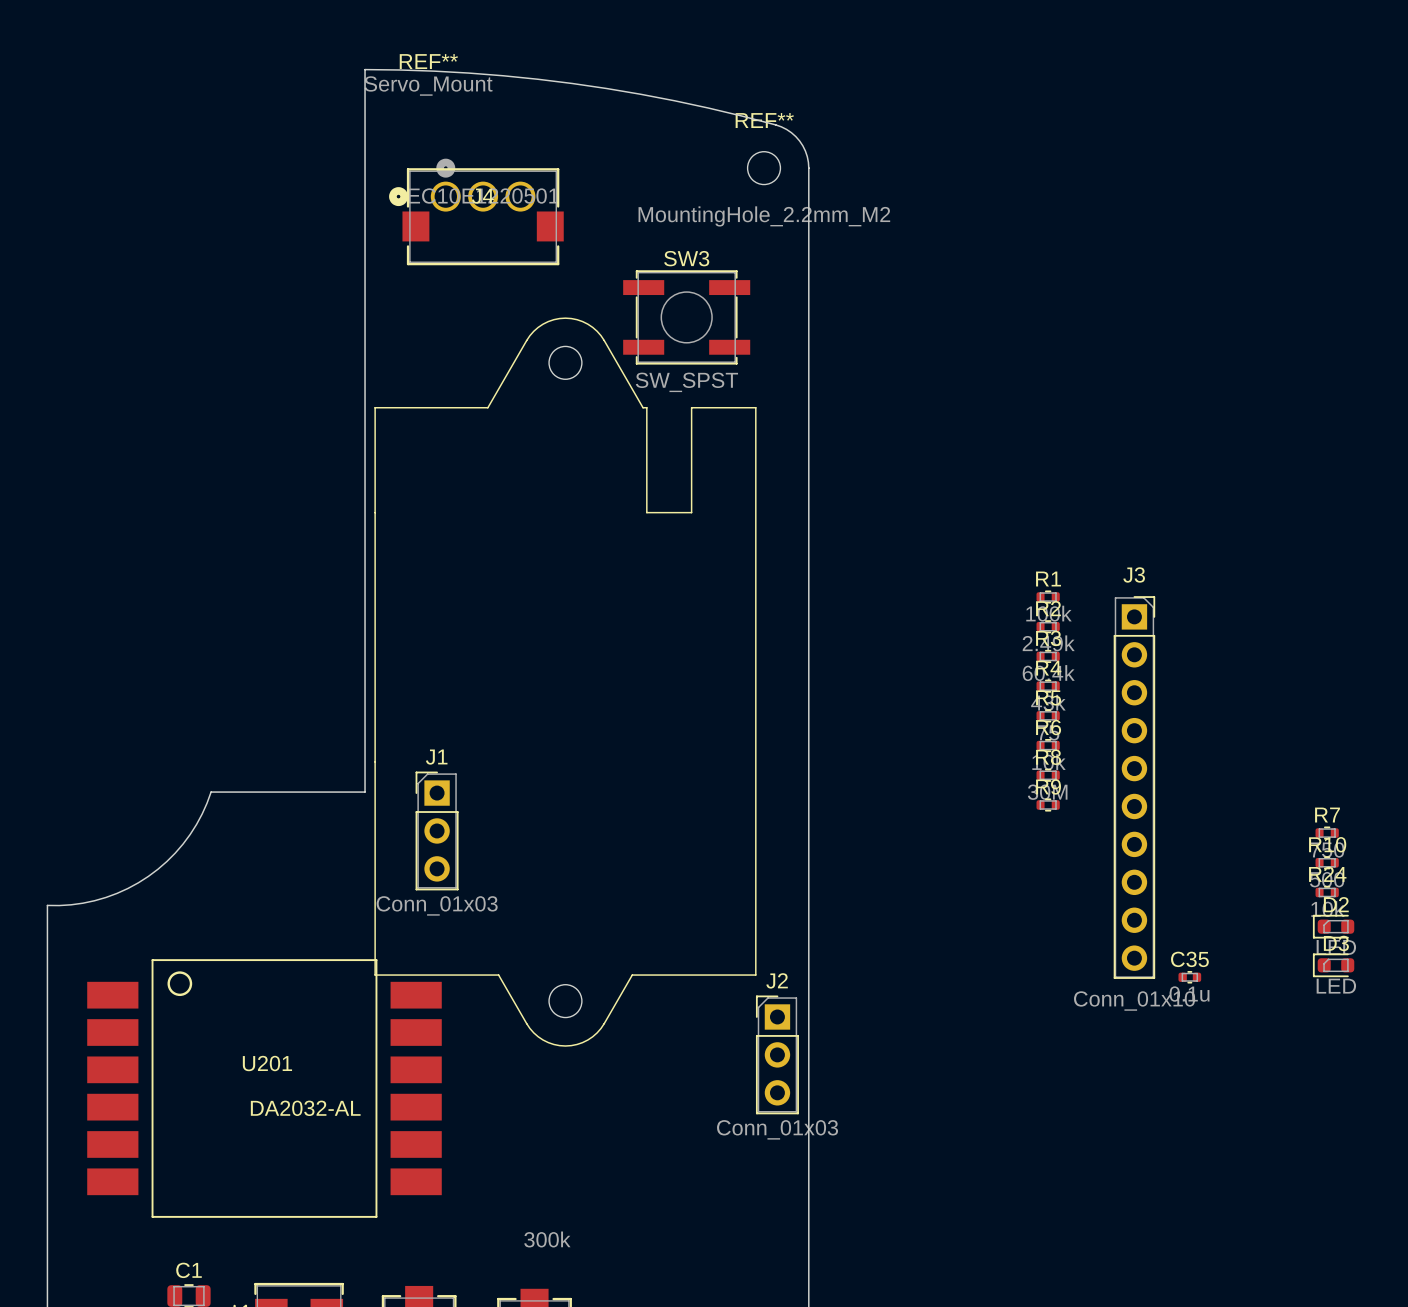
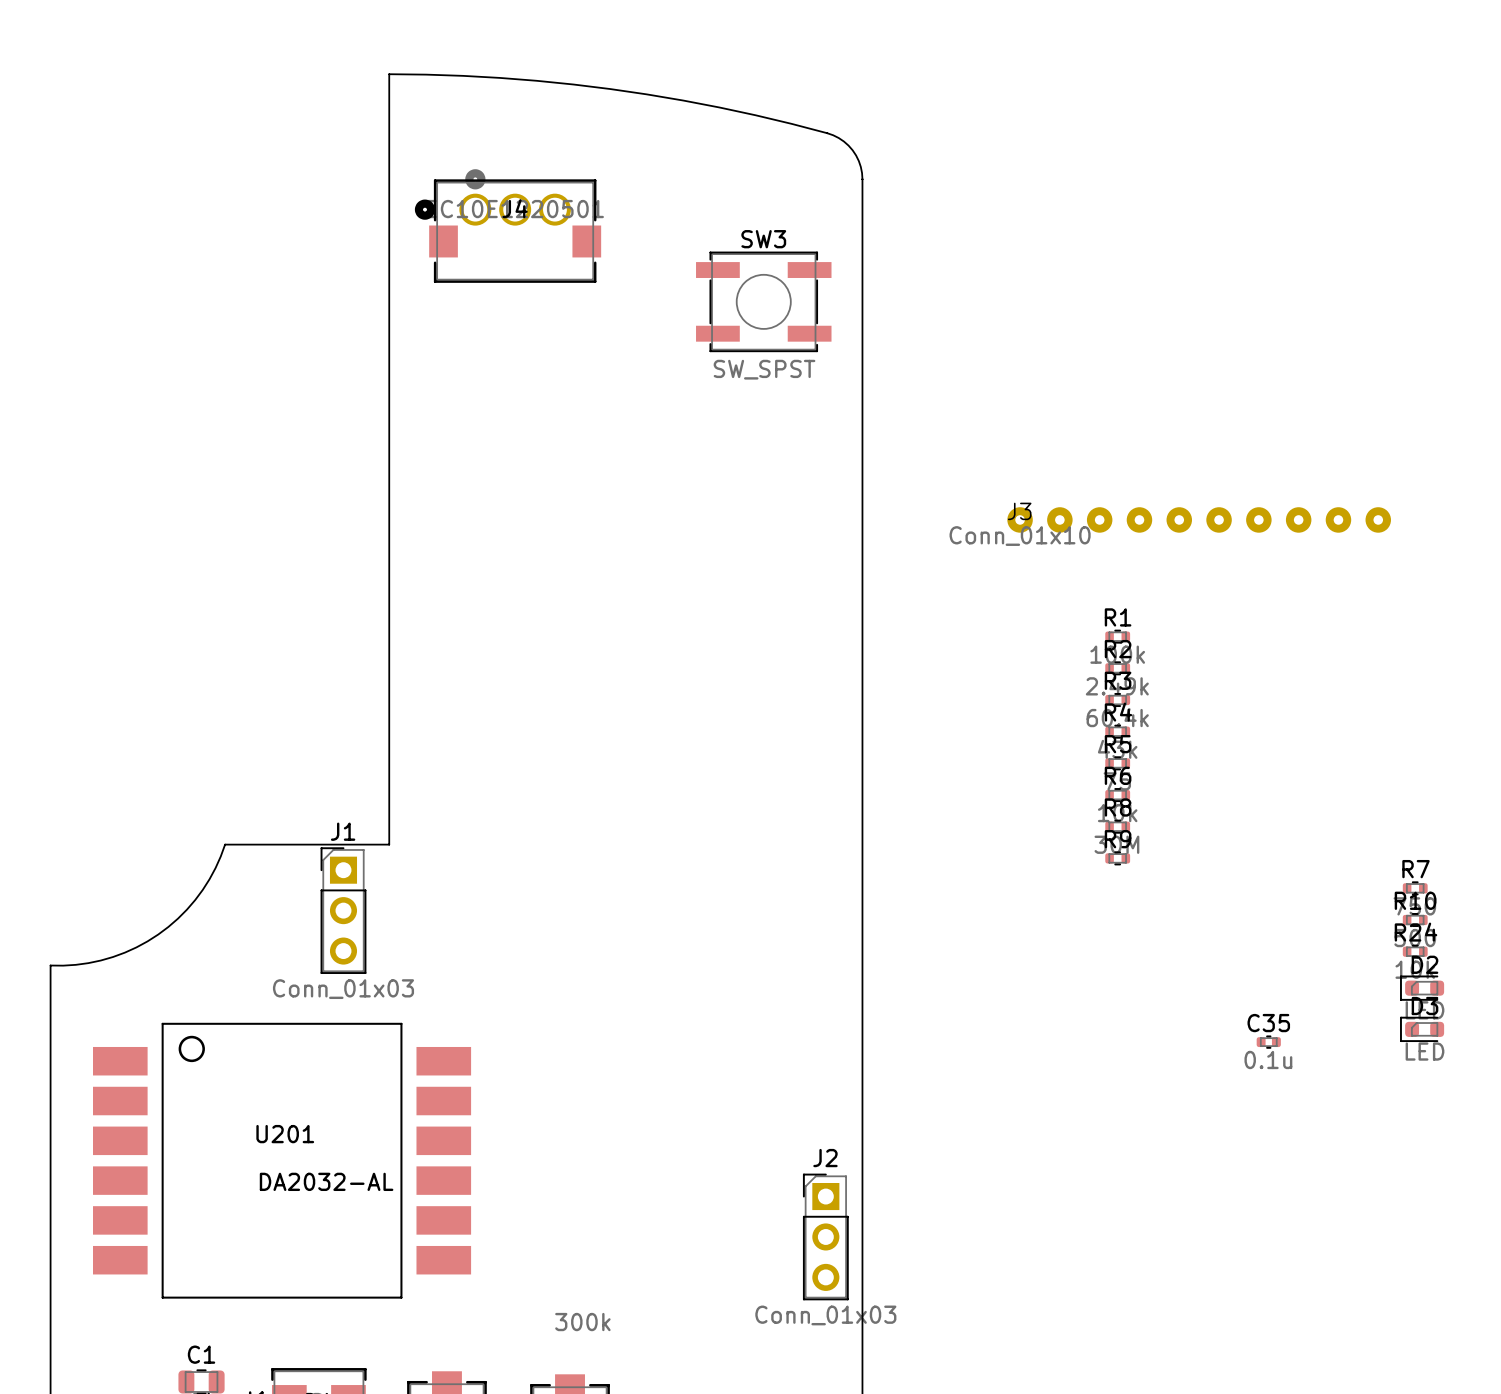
REF**: MountingHole_2.2mm_M2 (764, 168) -> none
SW3 position: (686, 317) -> (763, 301)
J3 name position: J3 (1134, 574) -> J3 (1019, 511)
J3 footprint: [1113, 596, 1156, 979] -> [1007, 507, 1391, 533]
REF**: Servo_Mount (565, 682) -> none
J1 position: (437, 830) -> (343, 910)
J3 value position: Conn_01x10 (1134, 1001) -> Conn_01x10 (1020, 536)
J2 position: (777, 1054) -> (825, 1236)

